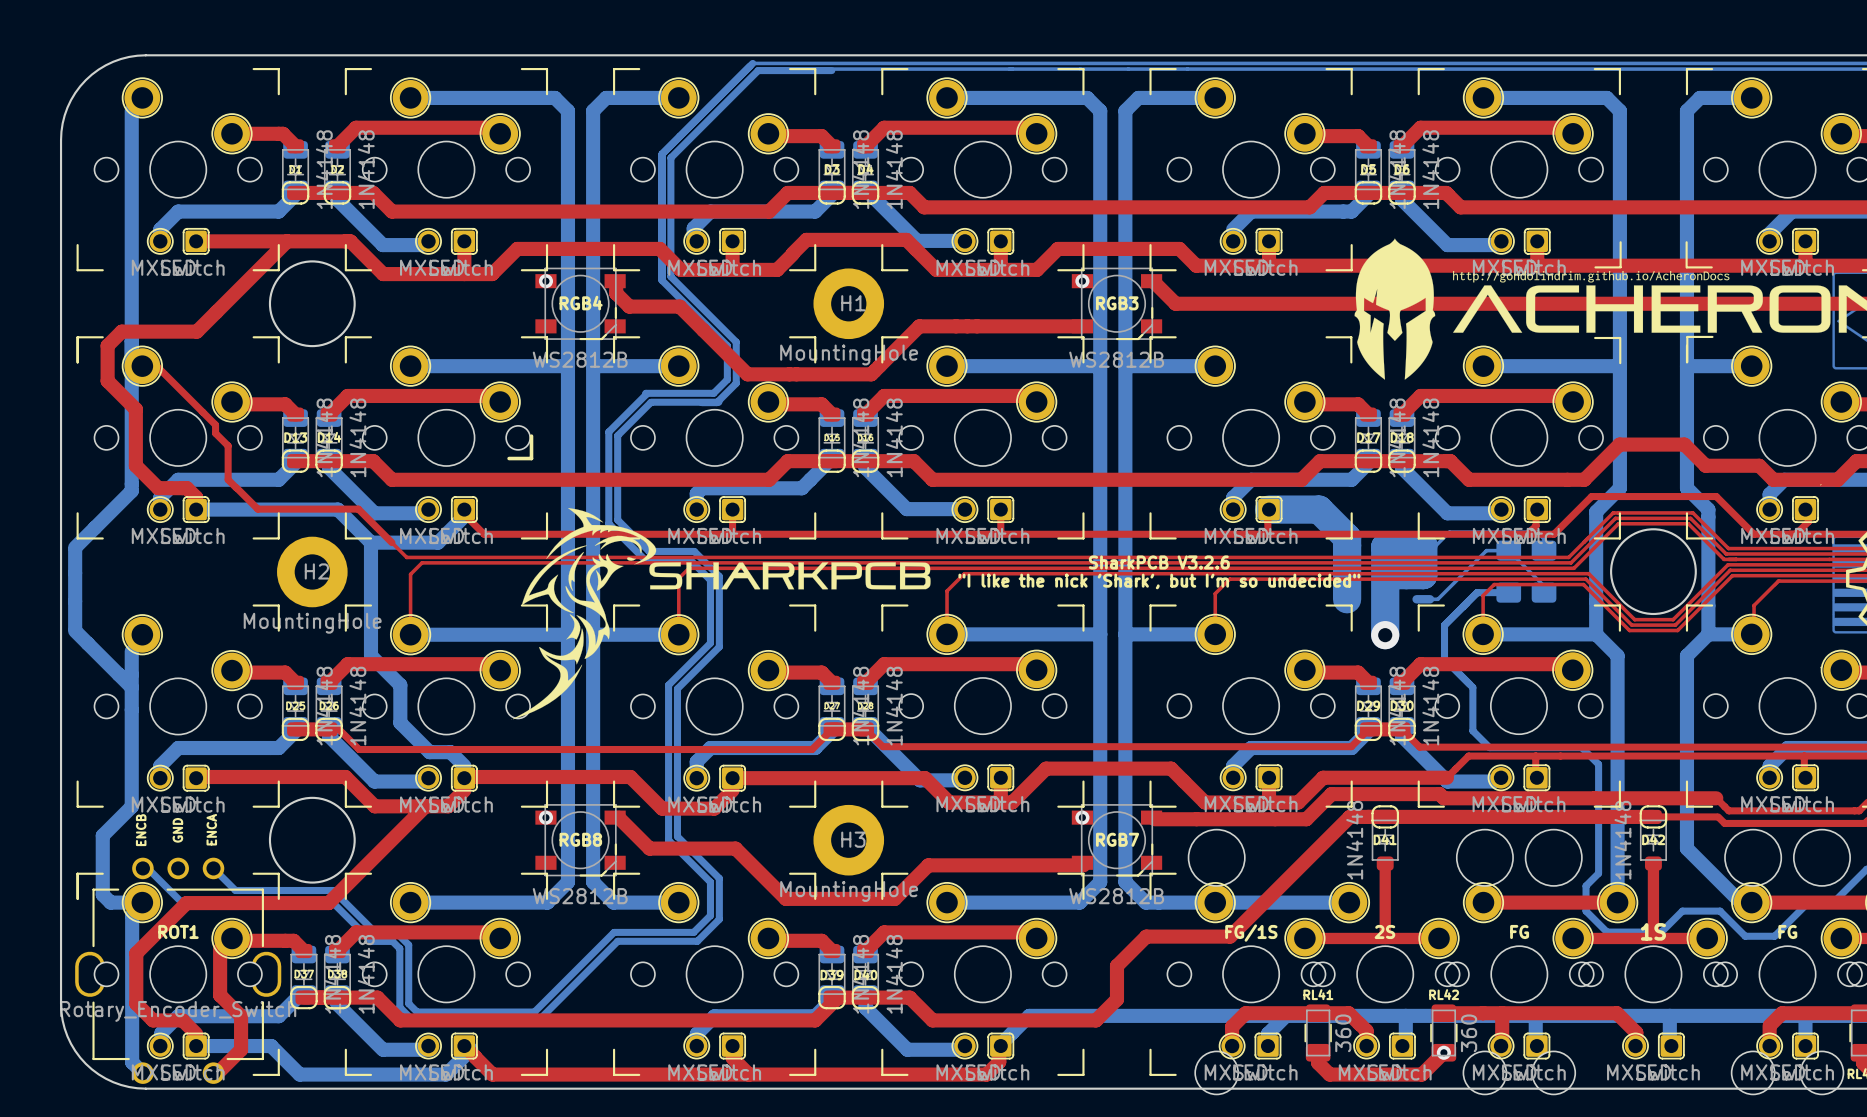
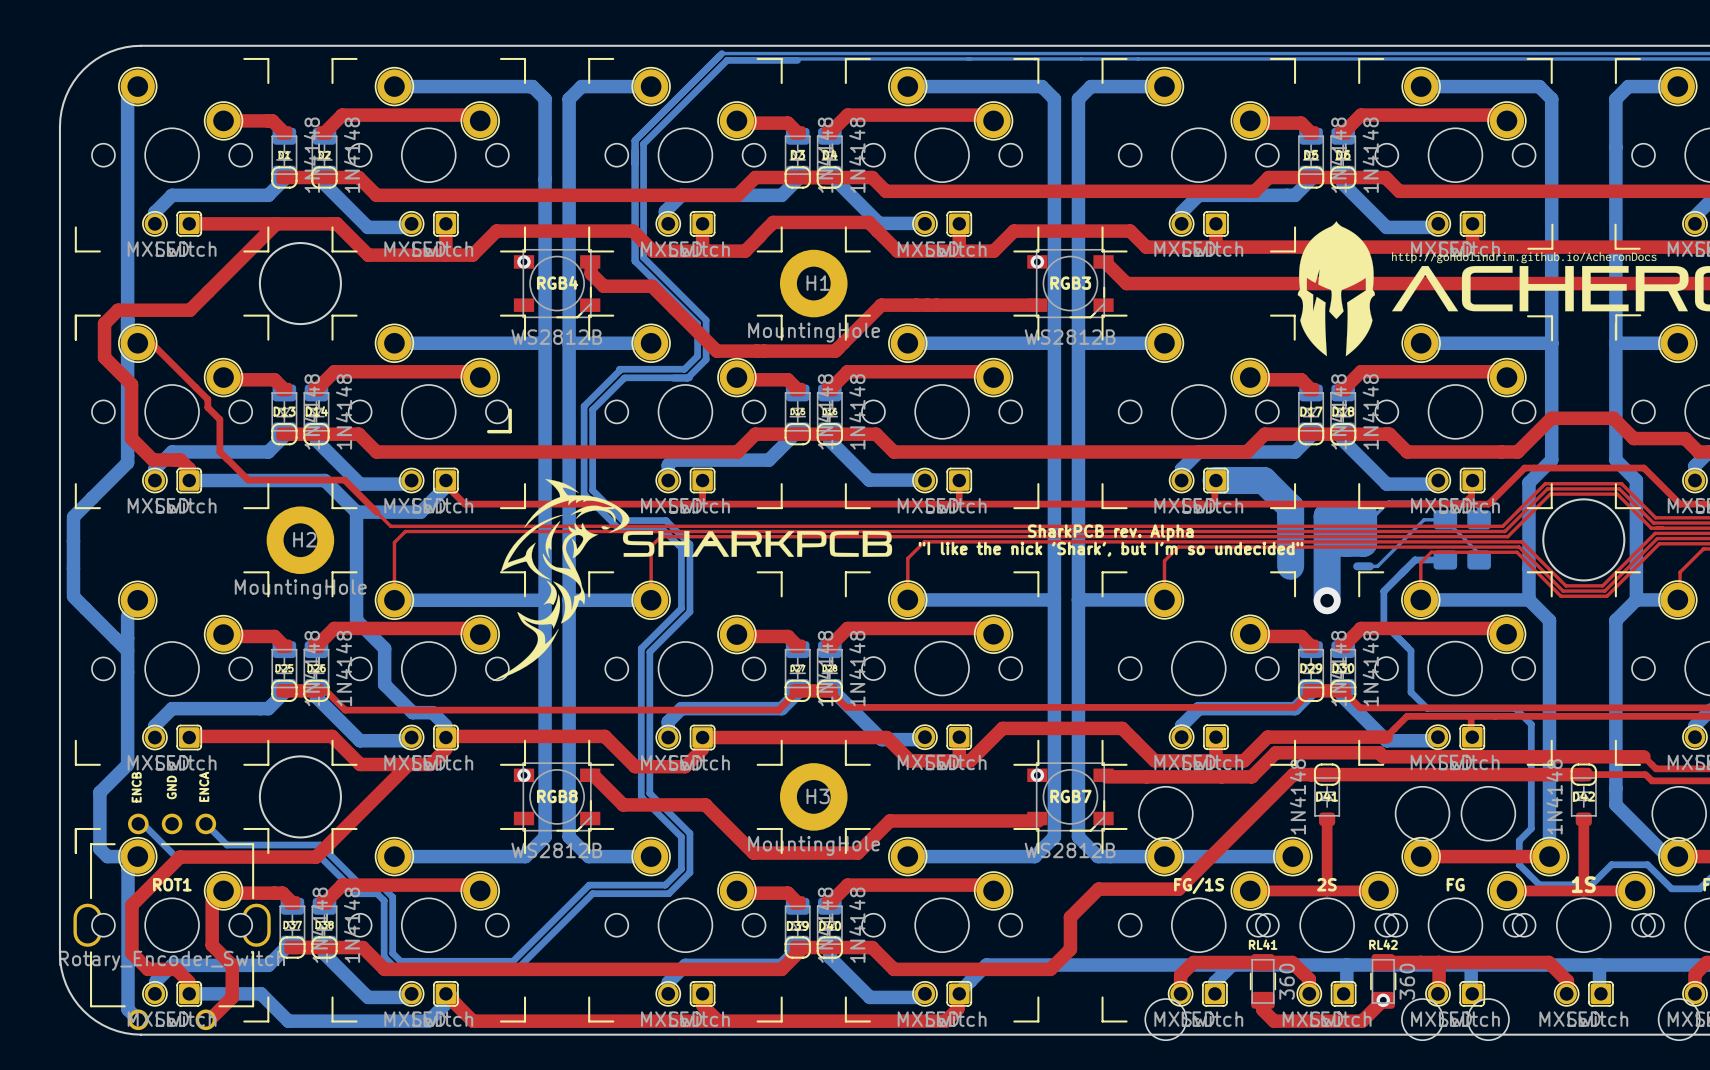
text: SharkPCB V3.2.6 (1159, 562) -> SharkPCB rev. Alpha (1110, 532)

